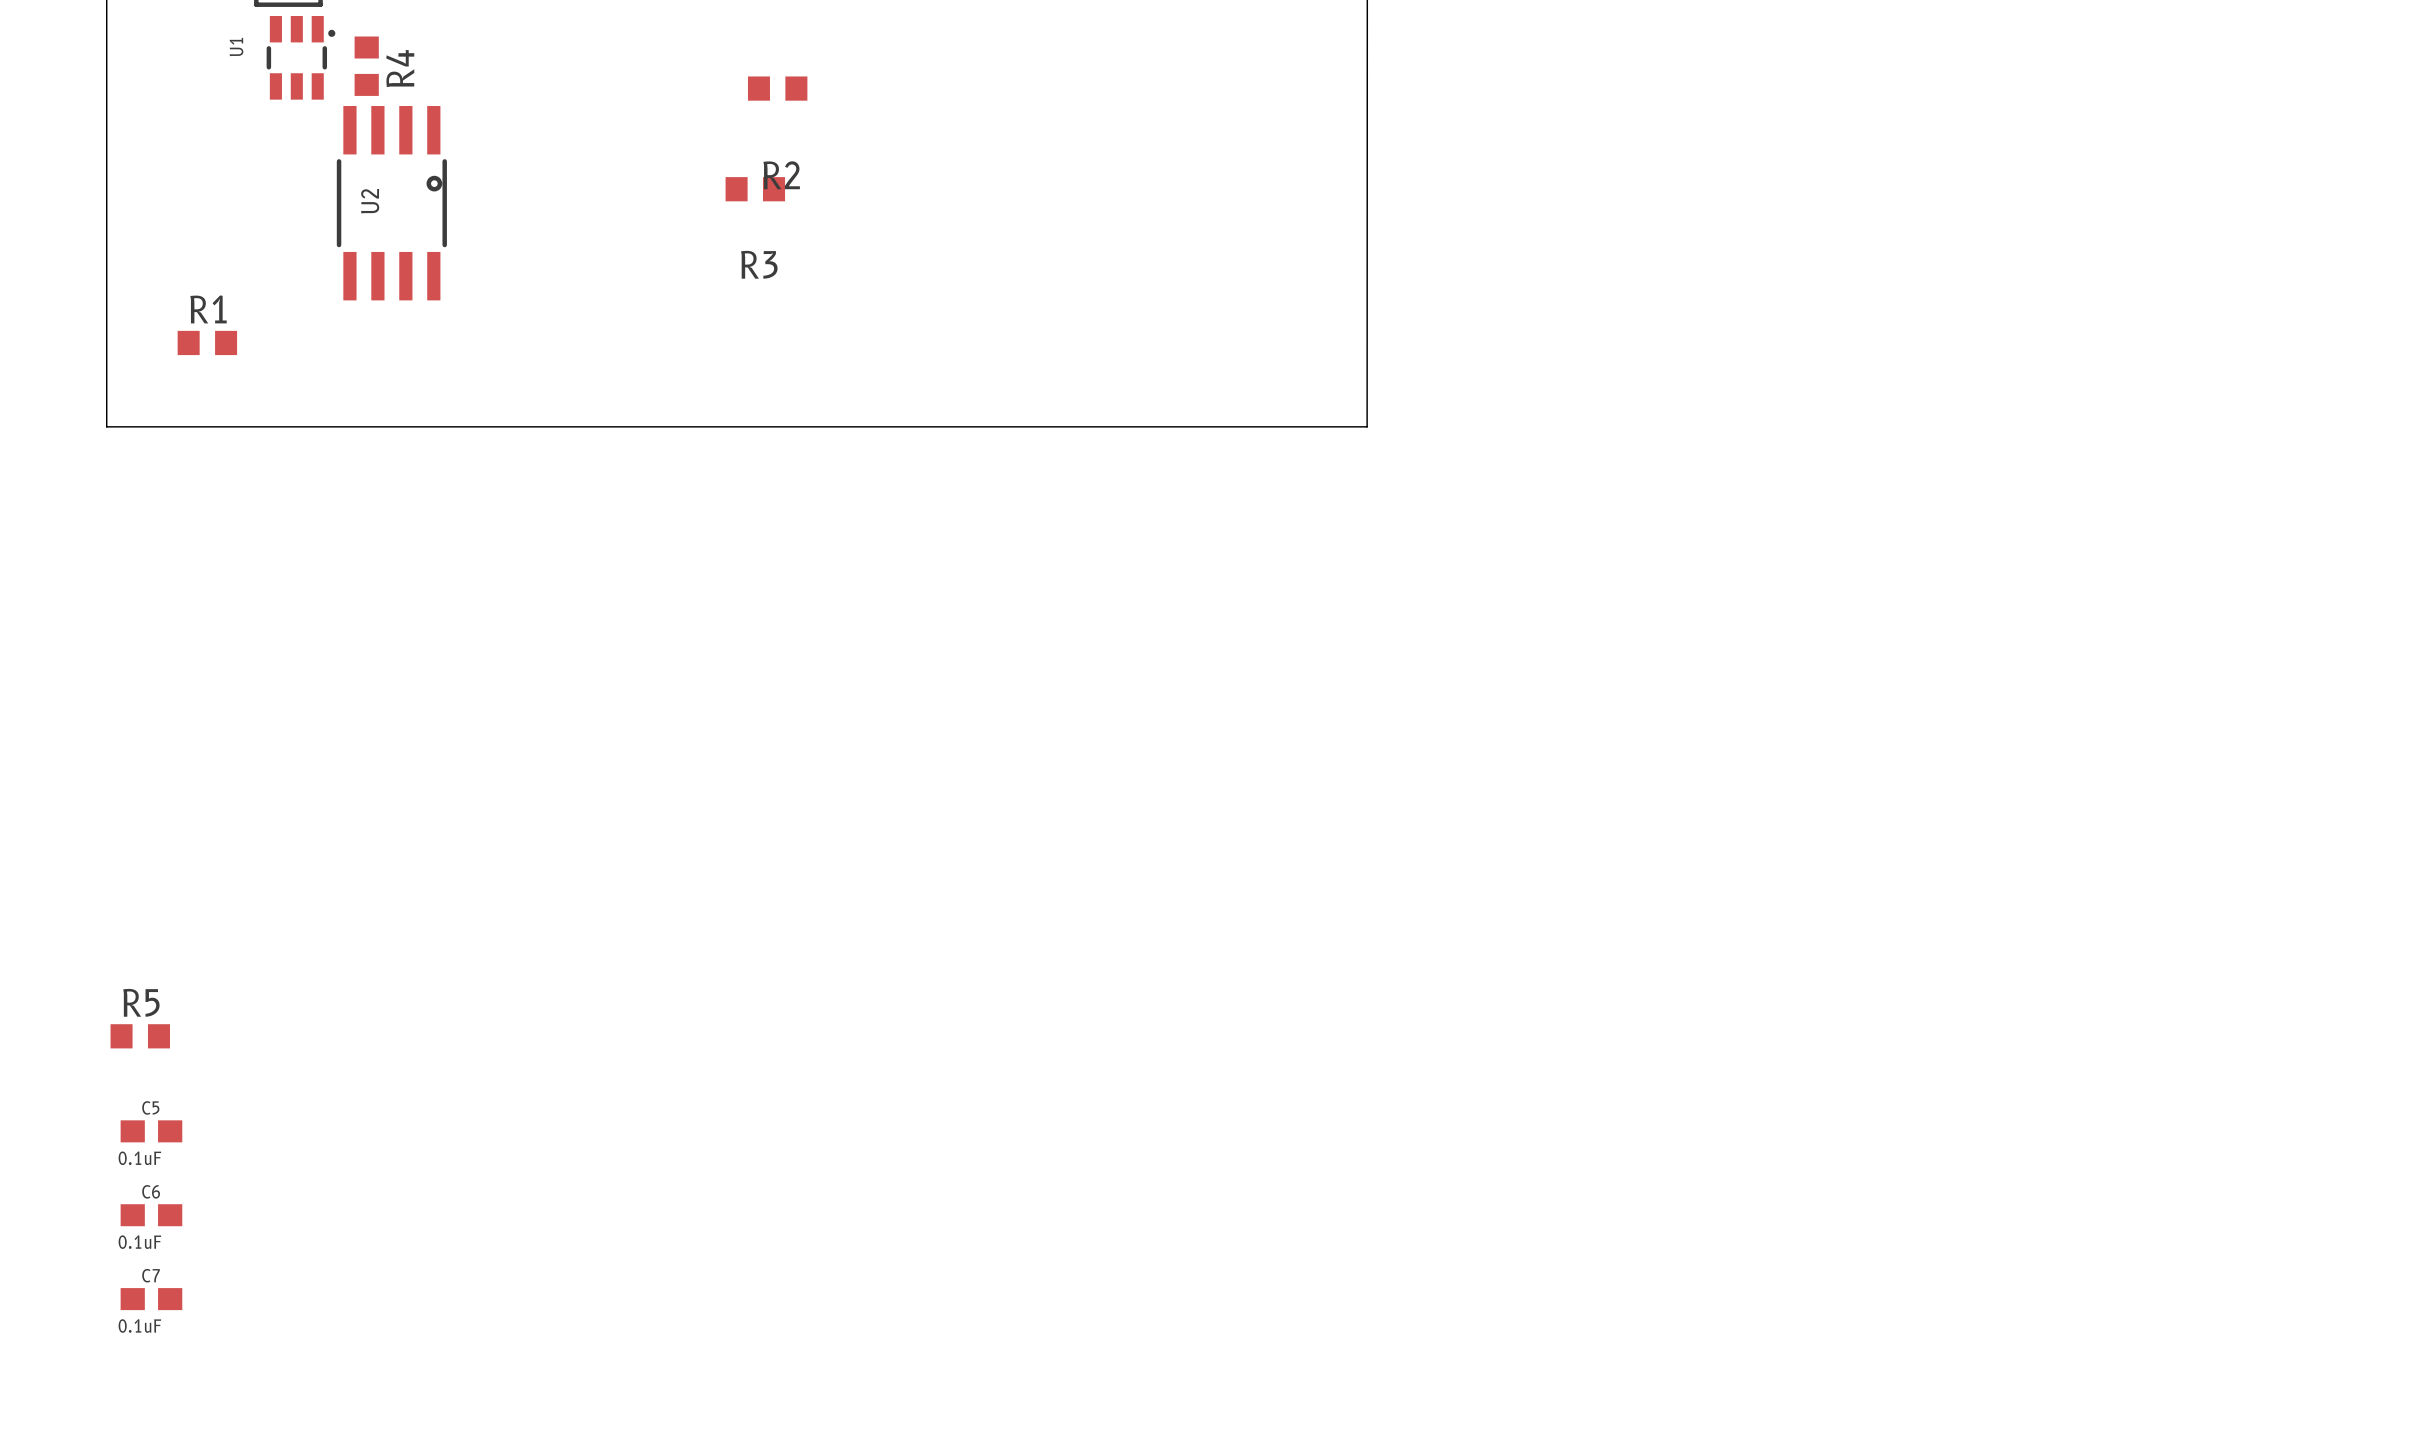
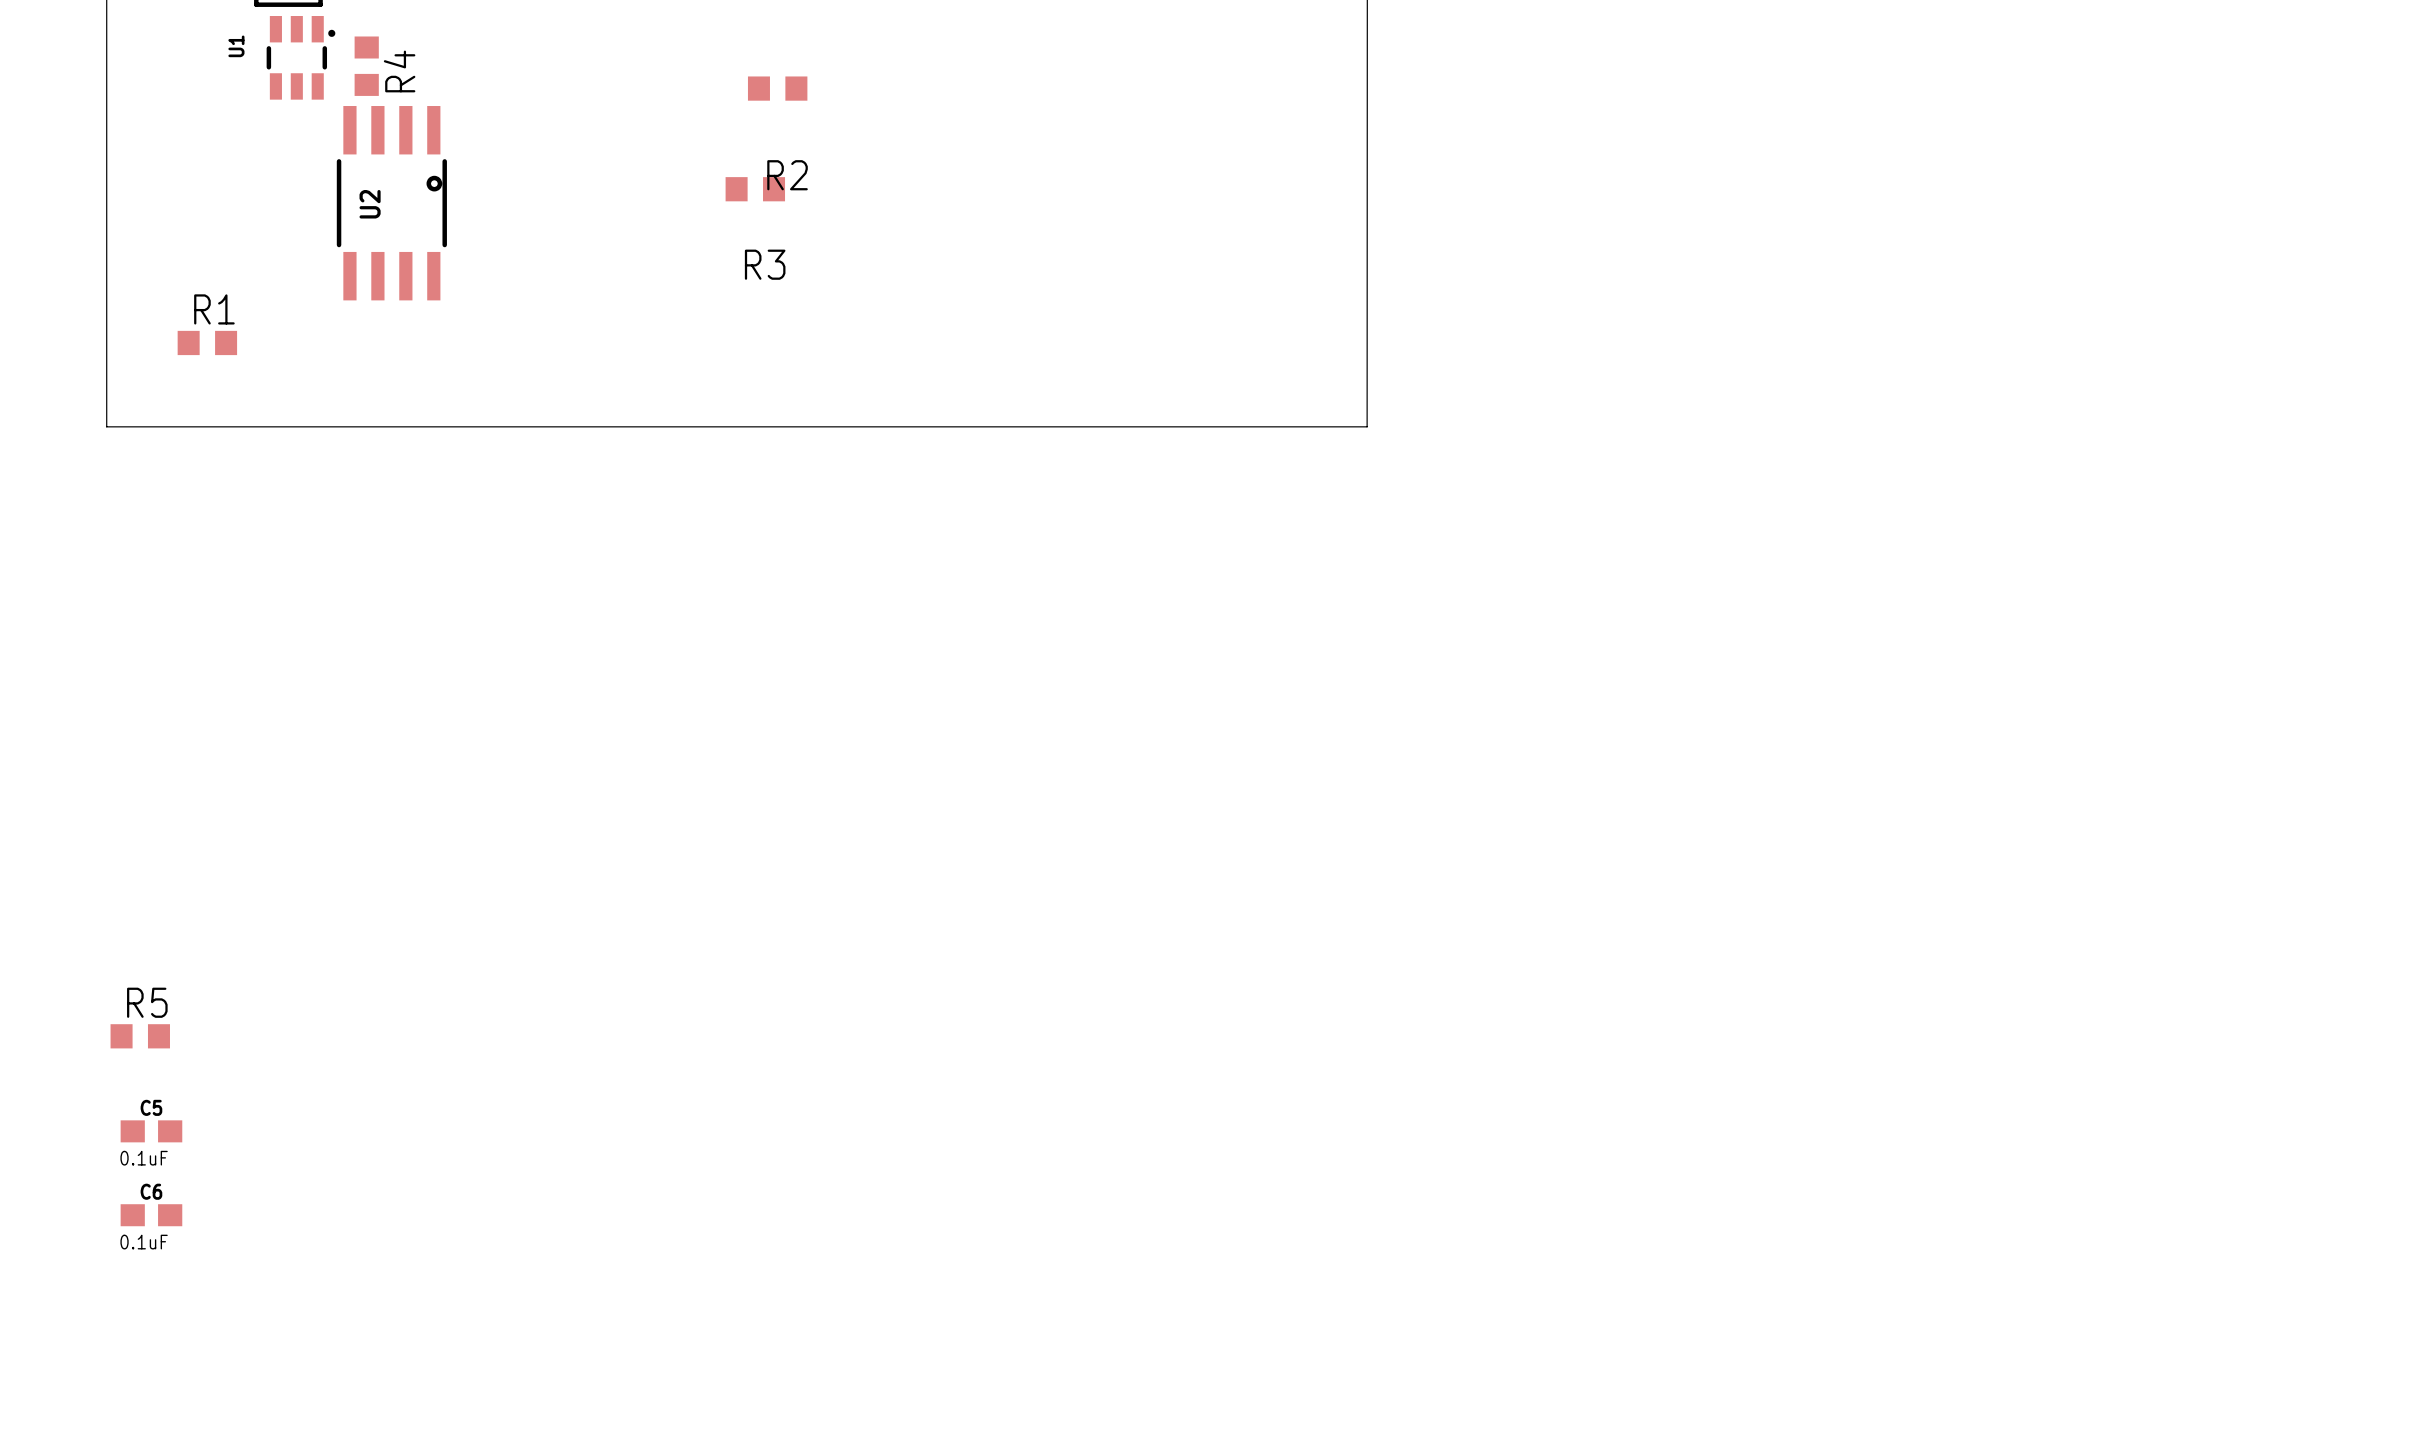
C7: 0.1uF (151, 1299) -> none

